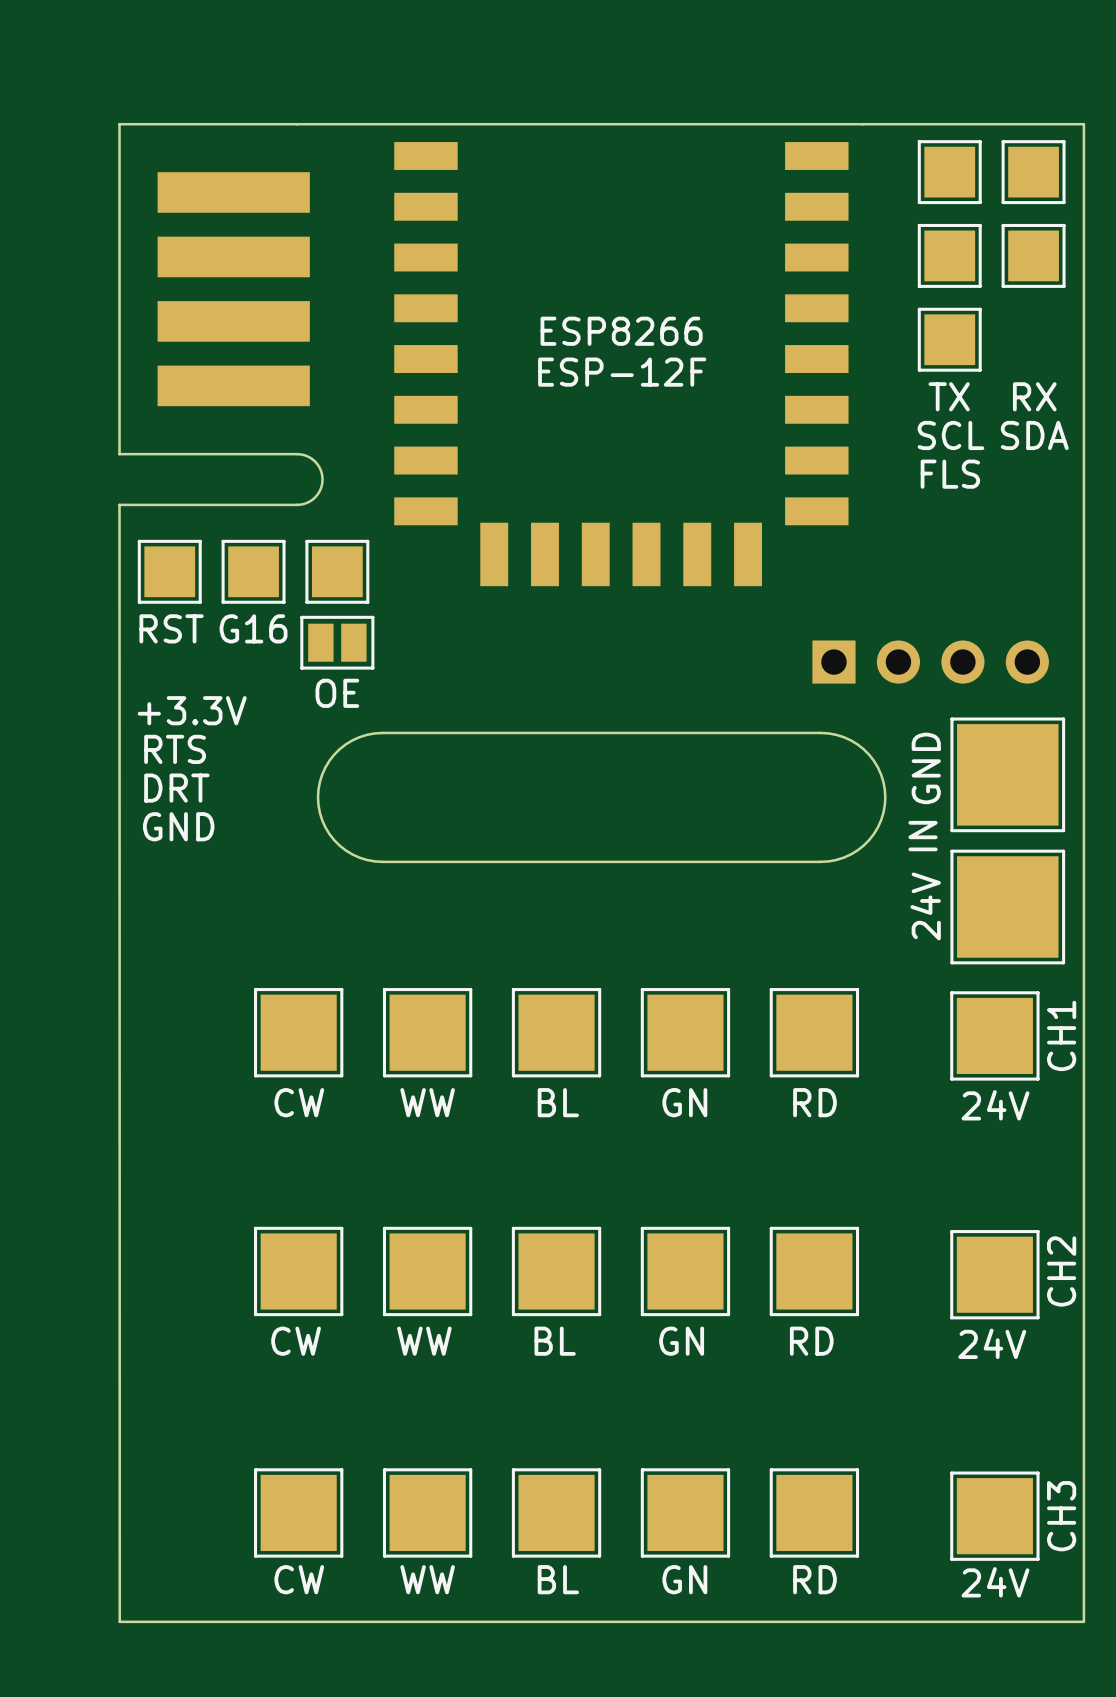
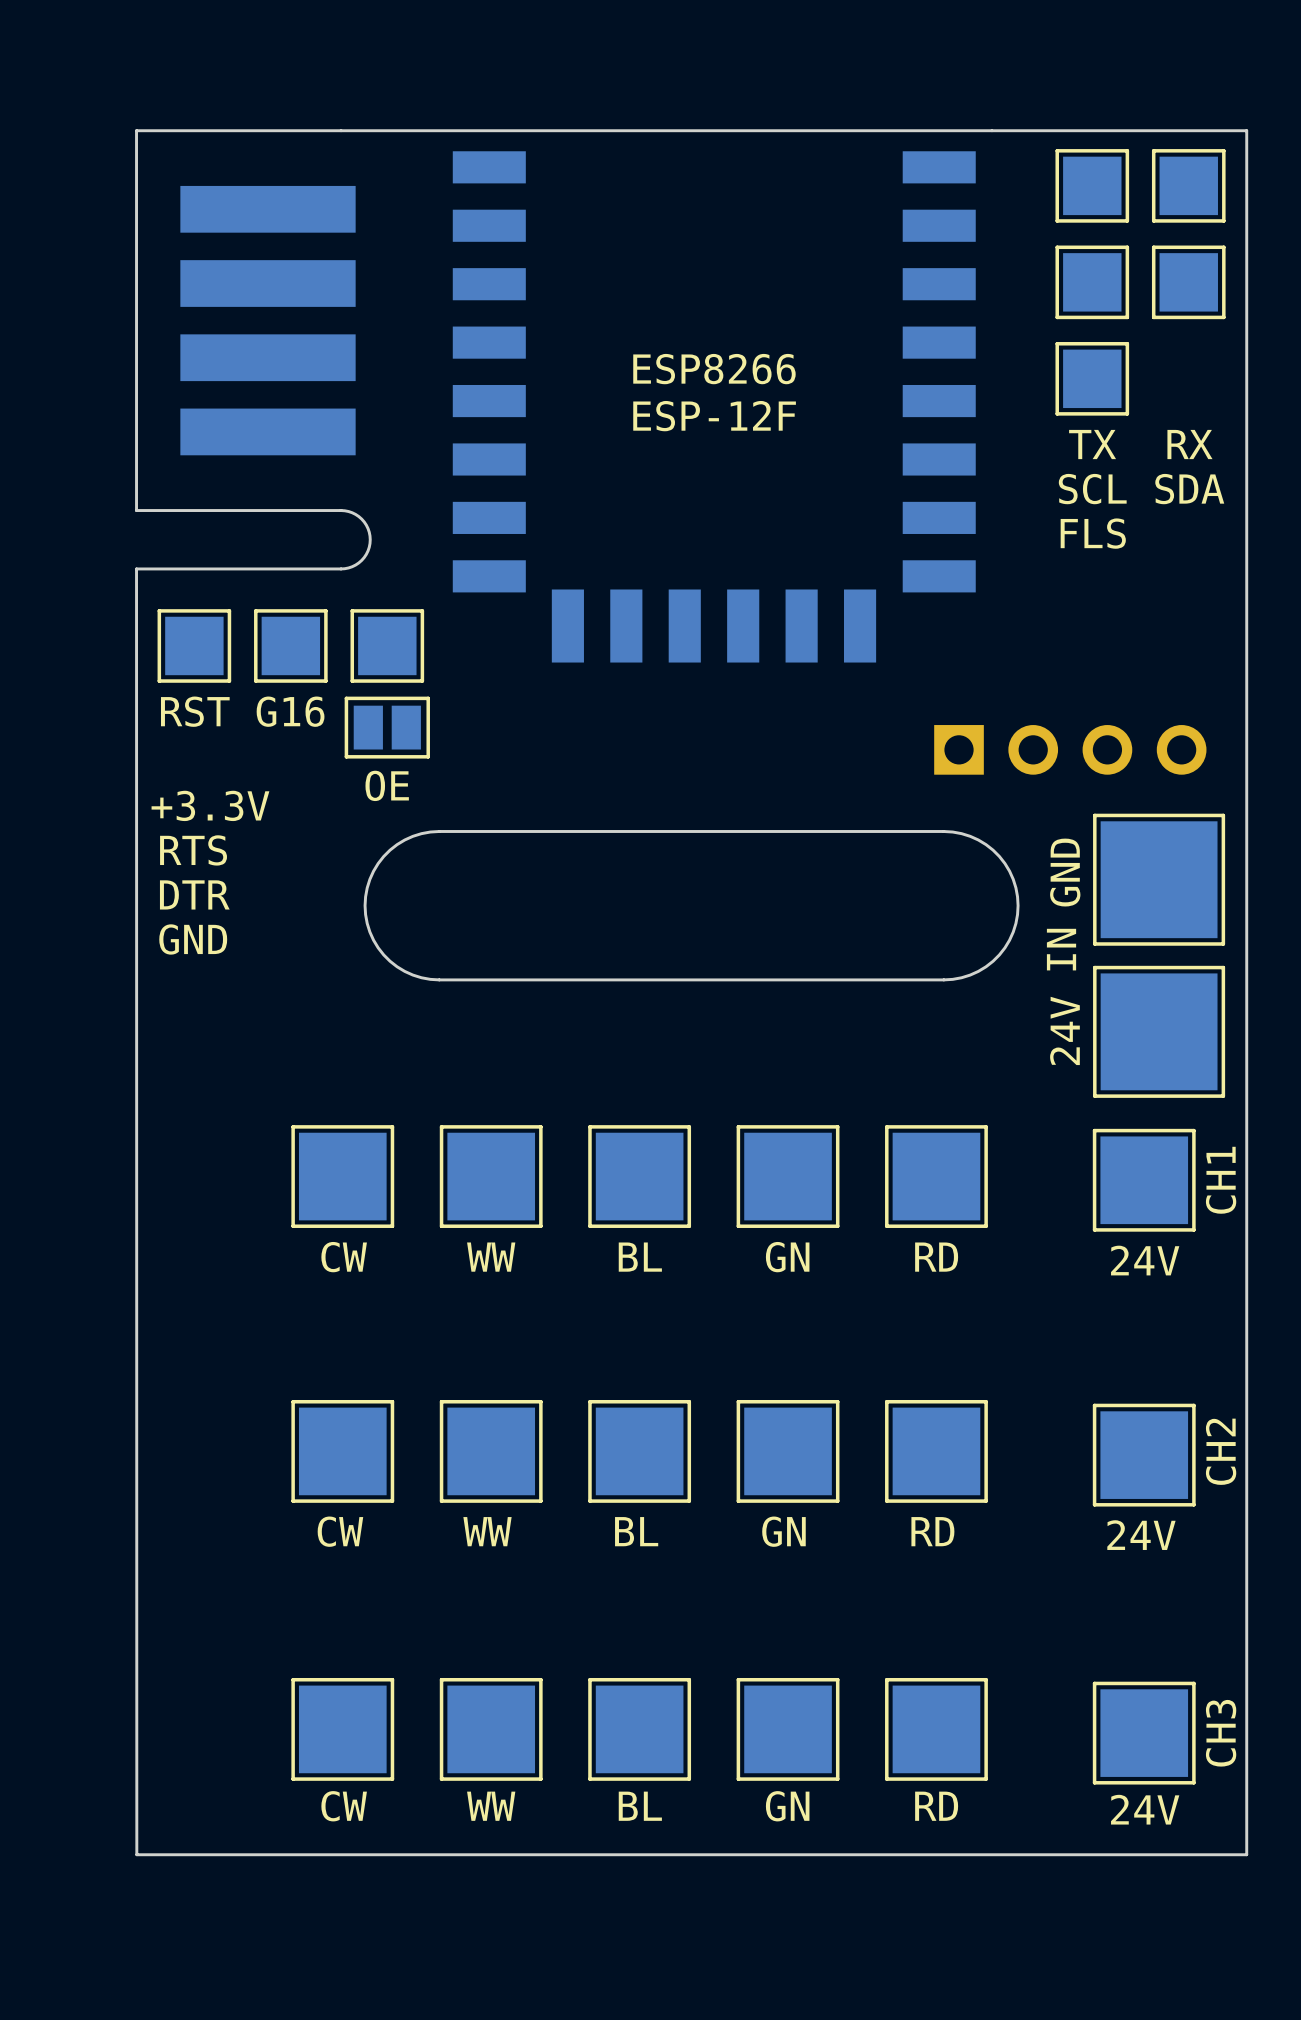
text: DRT (176, 788) -> DTR (194, 894)

